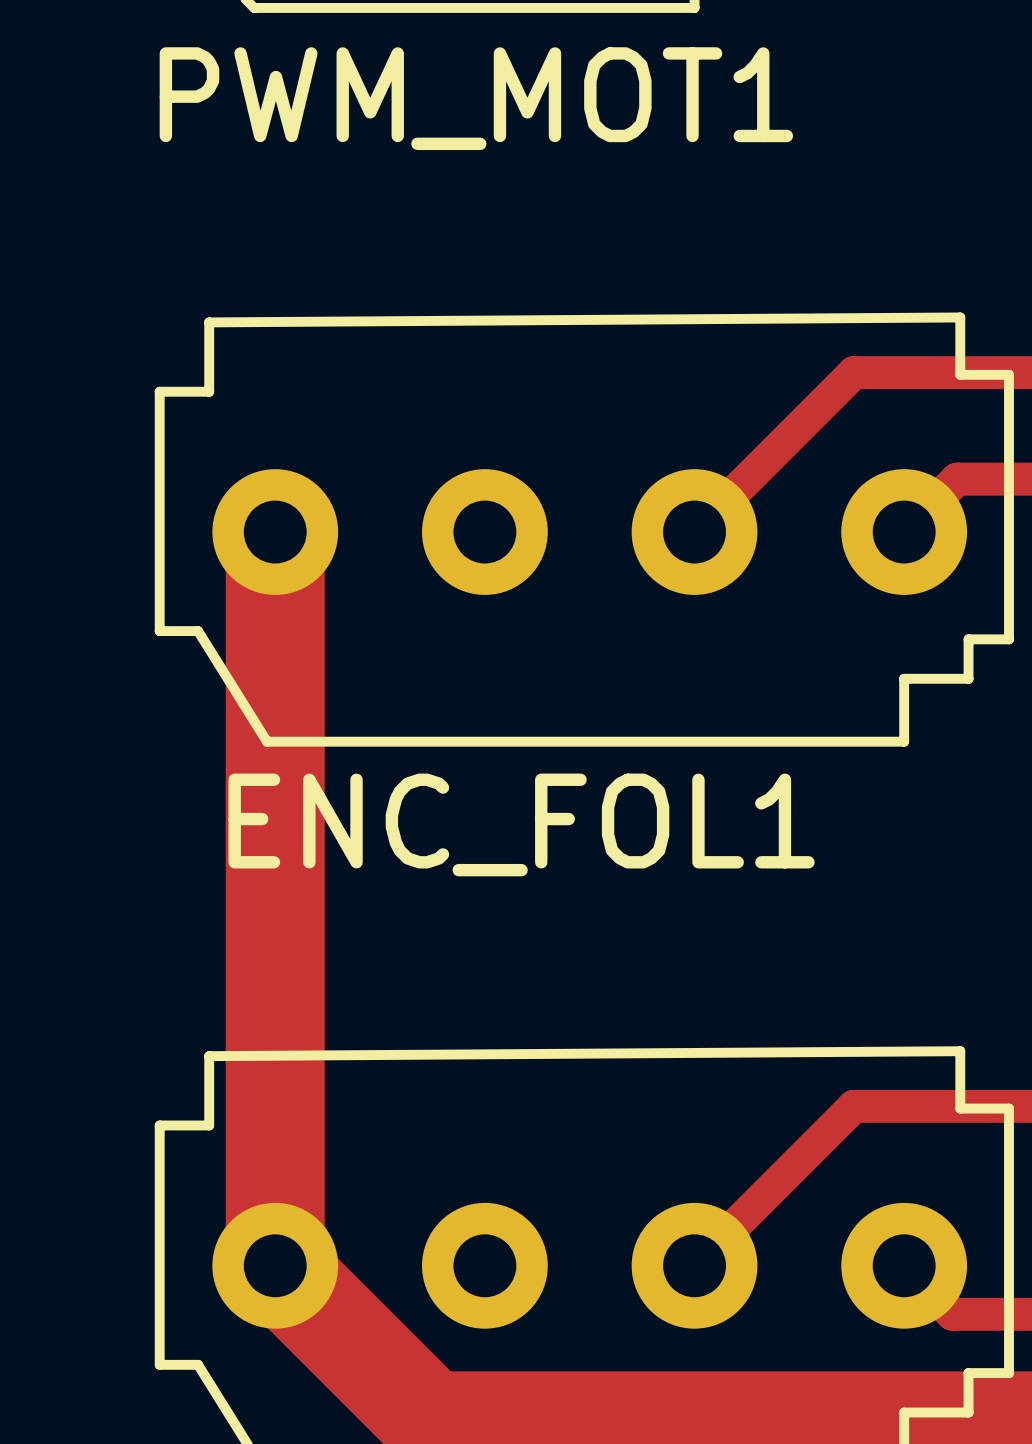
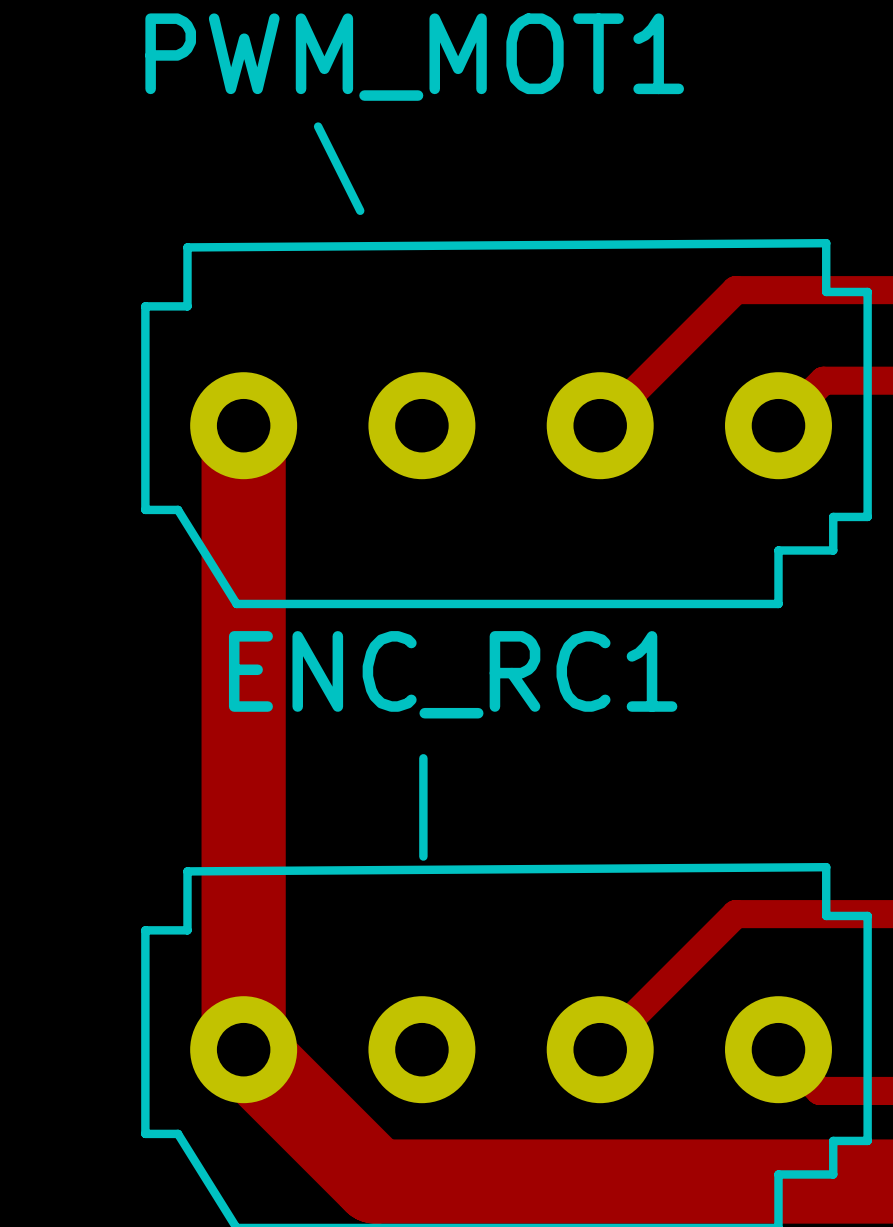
line: none -> (318, 126) (360, 210)
ENC_FOL1 name: ENC_FOL1 (521, 824) -> ENC_RC1 (453, 674)
line: none -> (423, 758) (423, 856)

